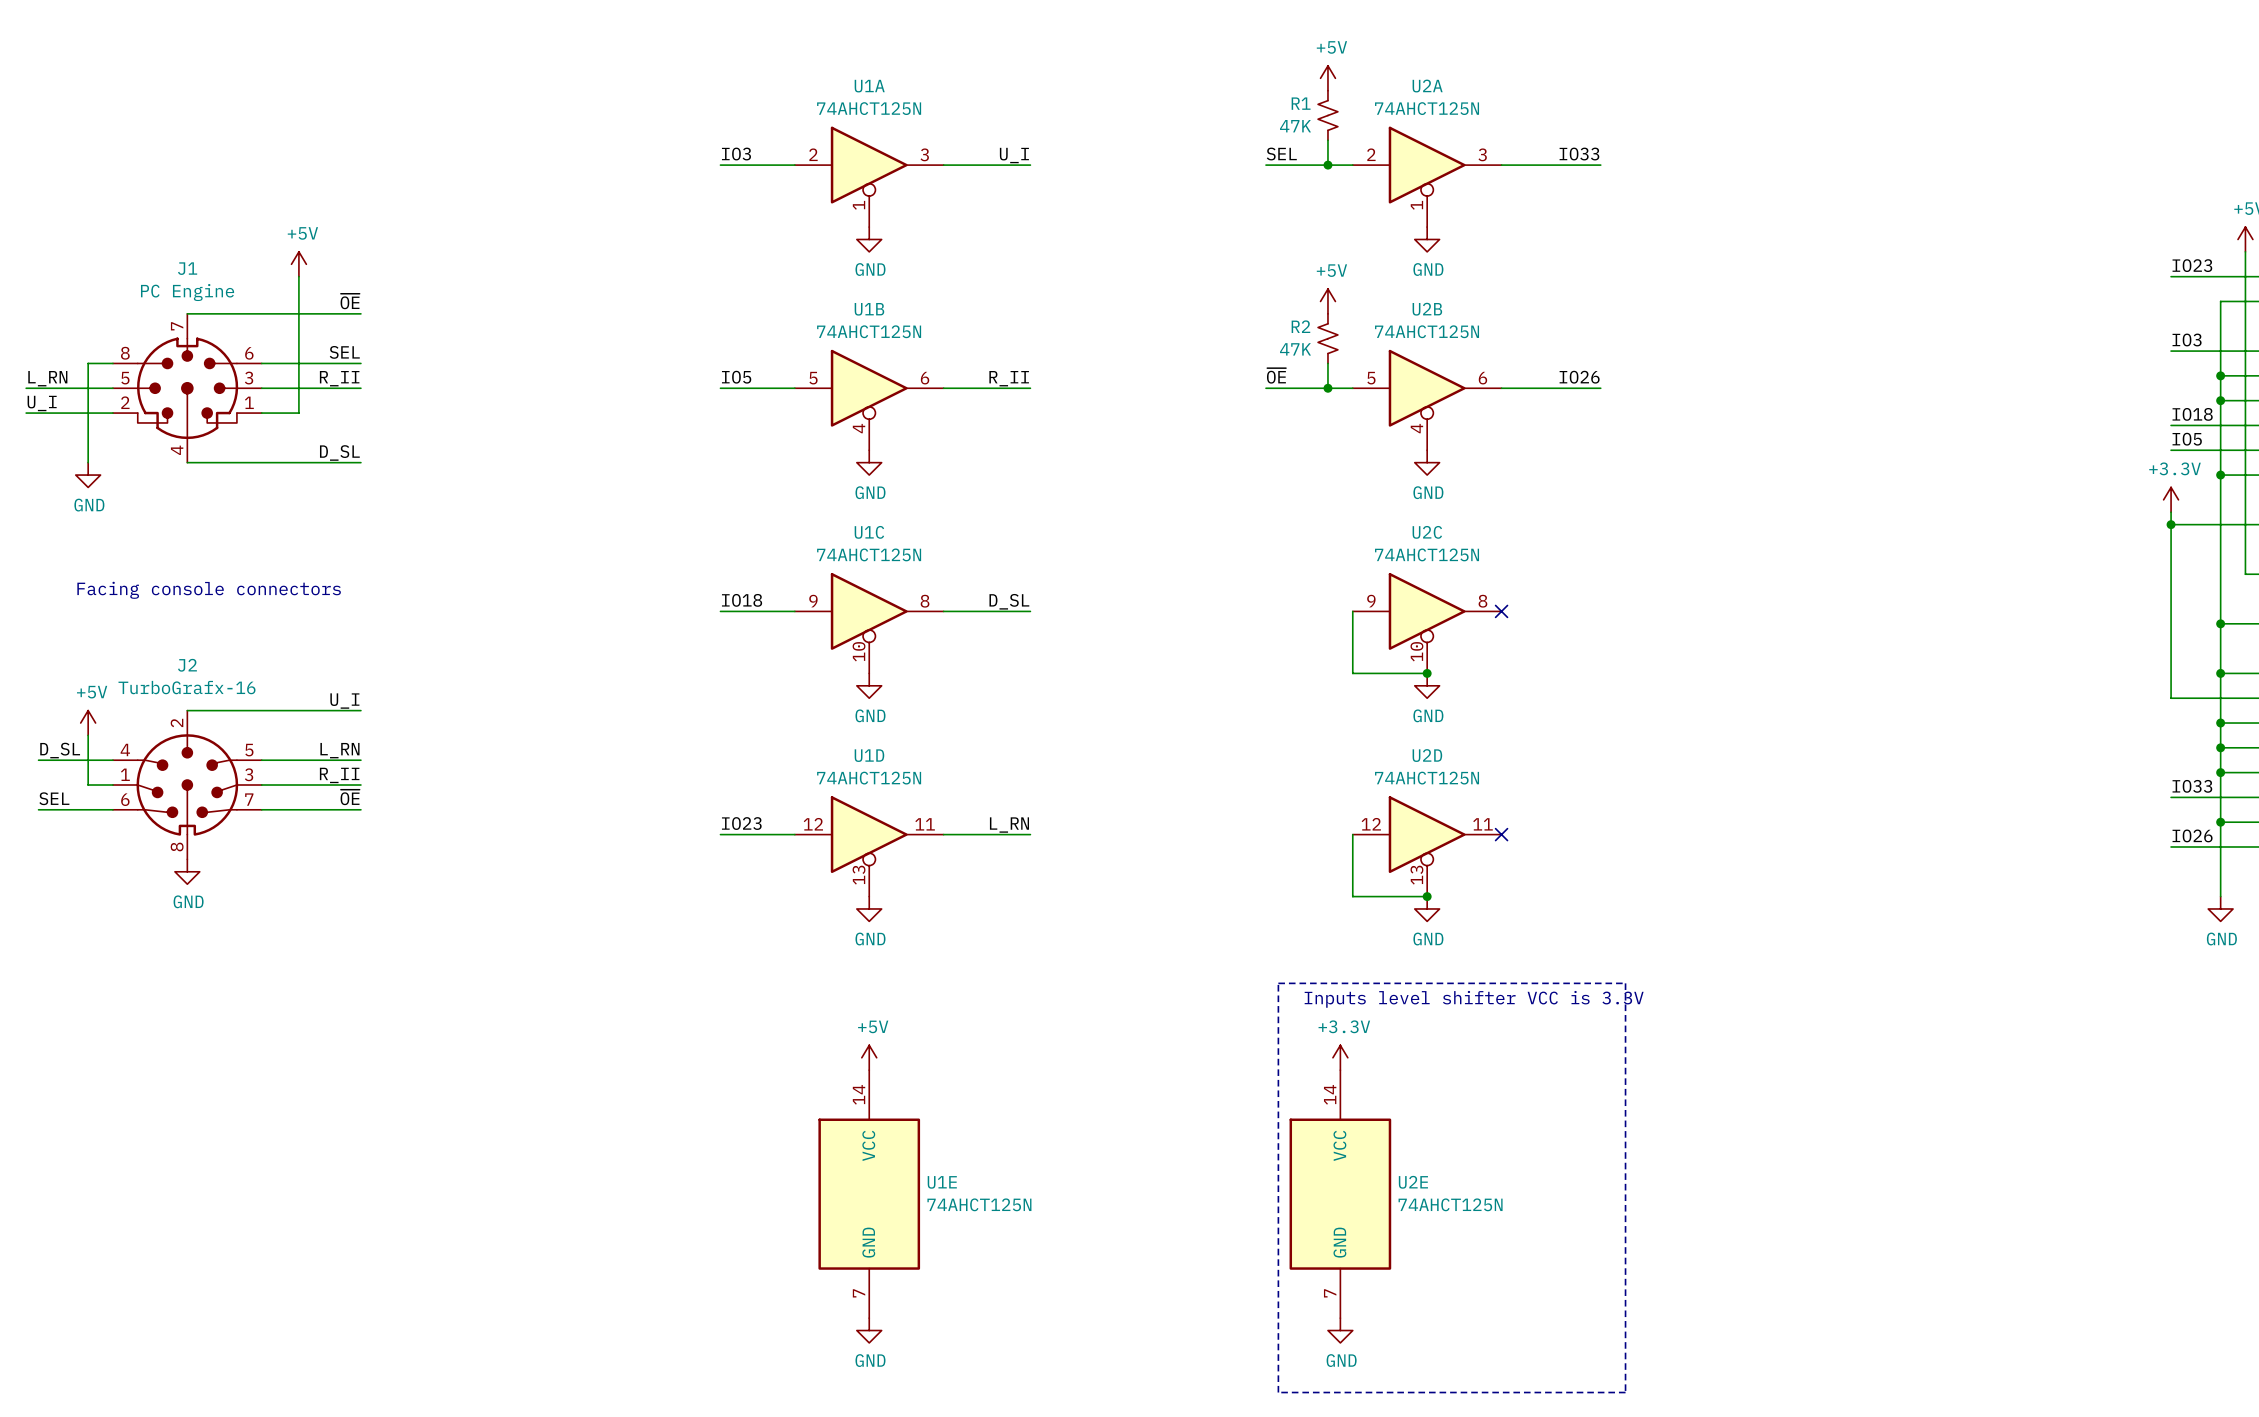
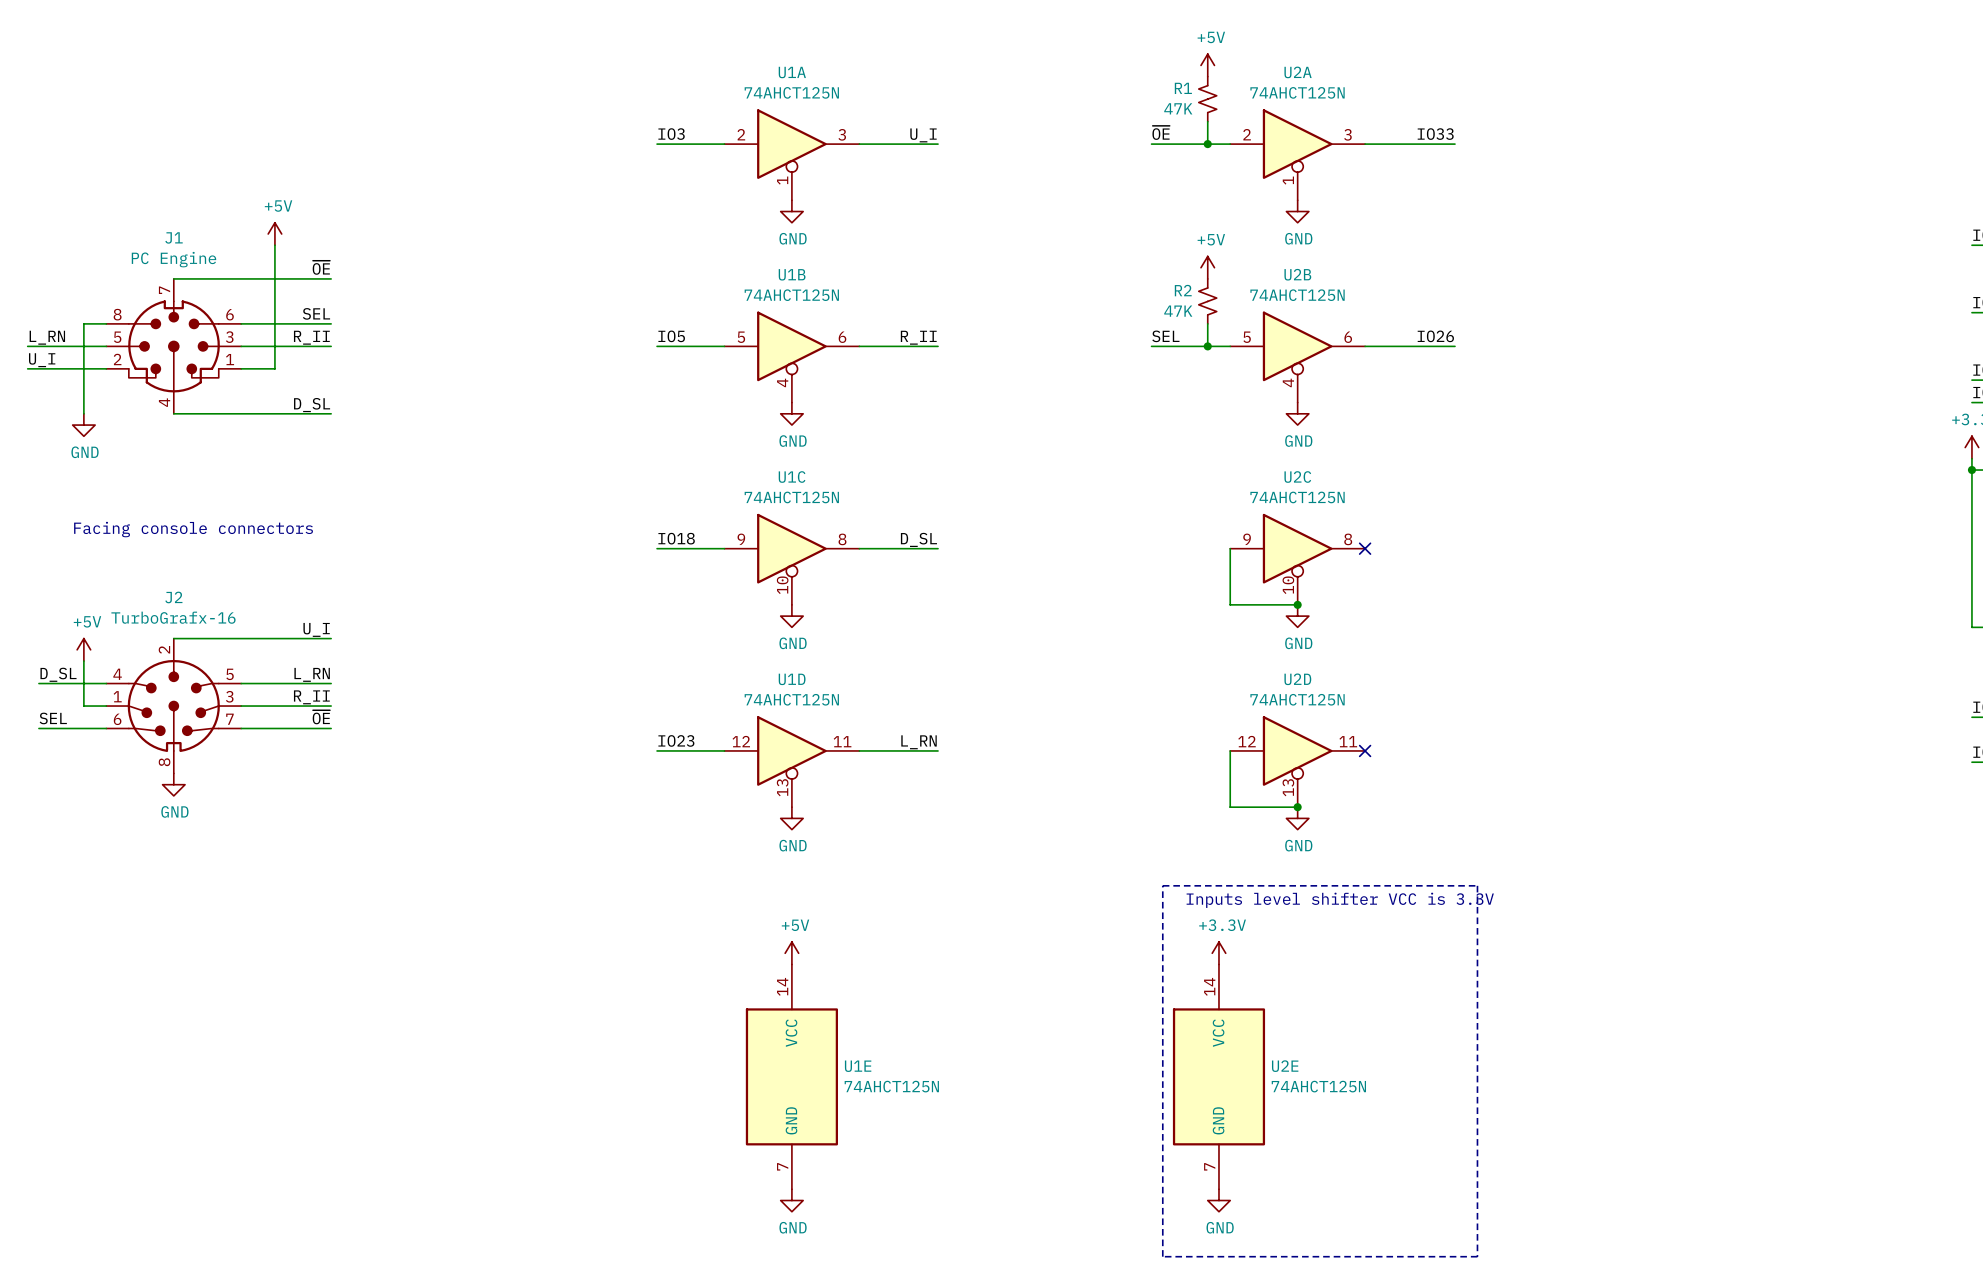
label: SEL (1281, 154) -> ~{OE} (1161, 132)
label: ~{OE} (1276, 375) -> SEL (1165, 336)

